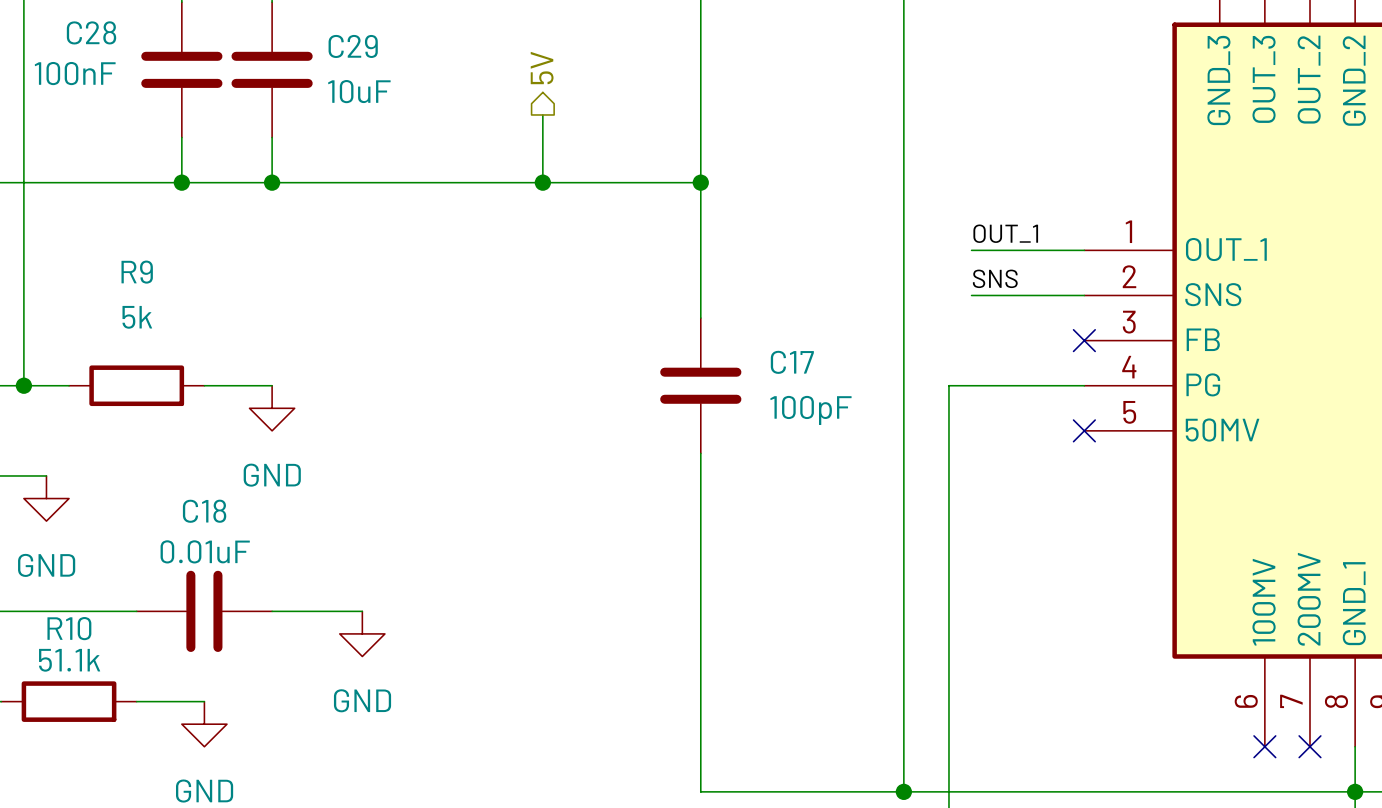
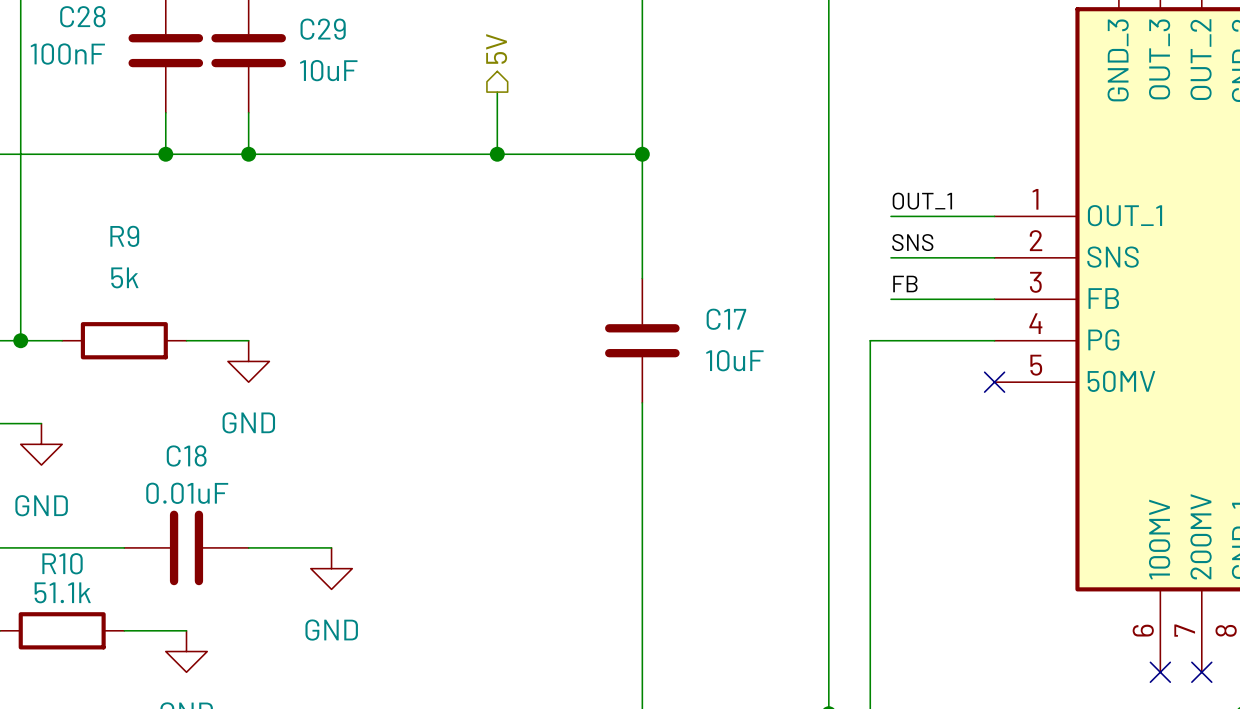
label: none -> FB (905, 284)
wire: none -> (890, 299) (994, 299)
no-connect mark: (1084, 340) -> none
C17 value: 100pF (810, 410) -> 10uF (734, 360)

